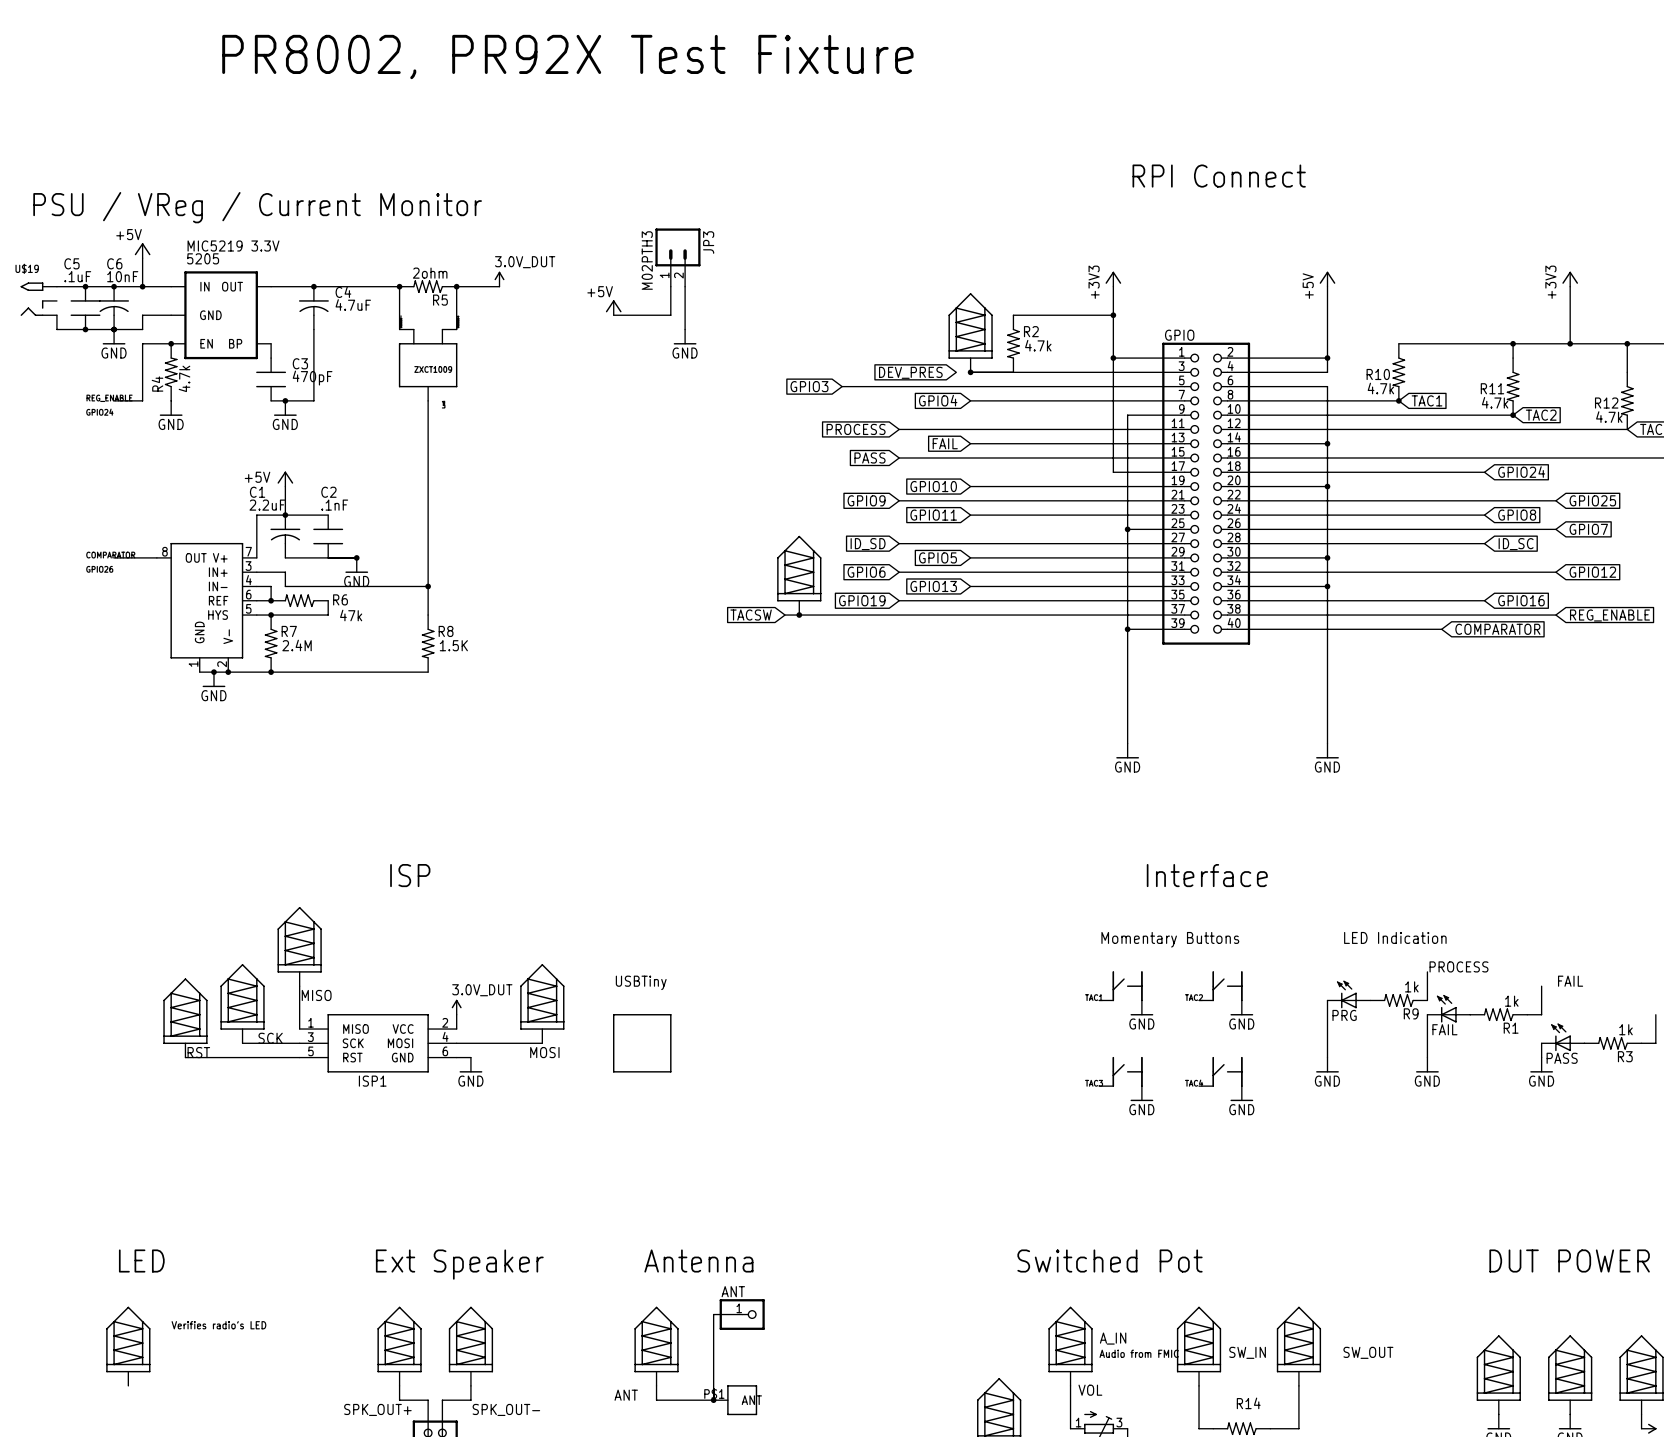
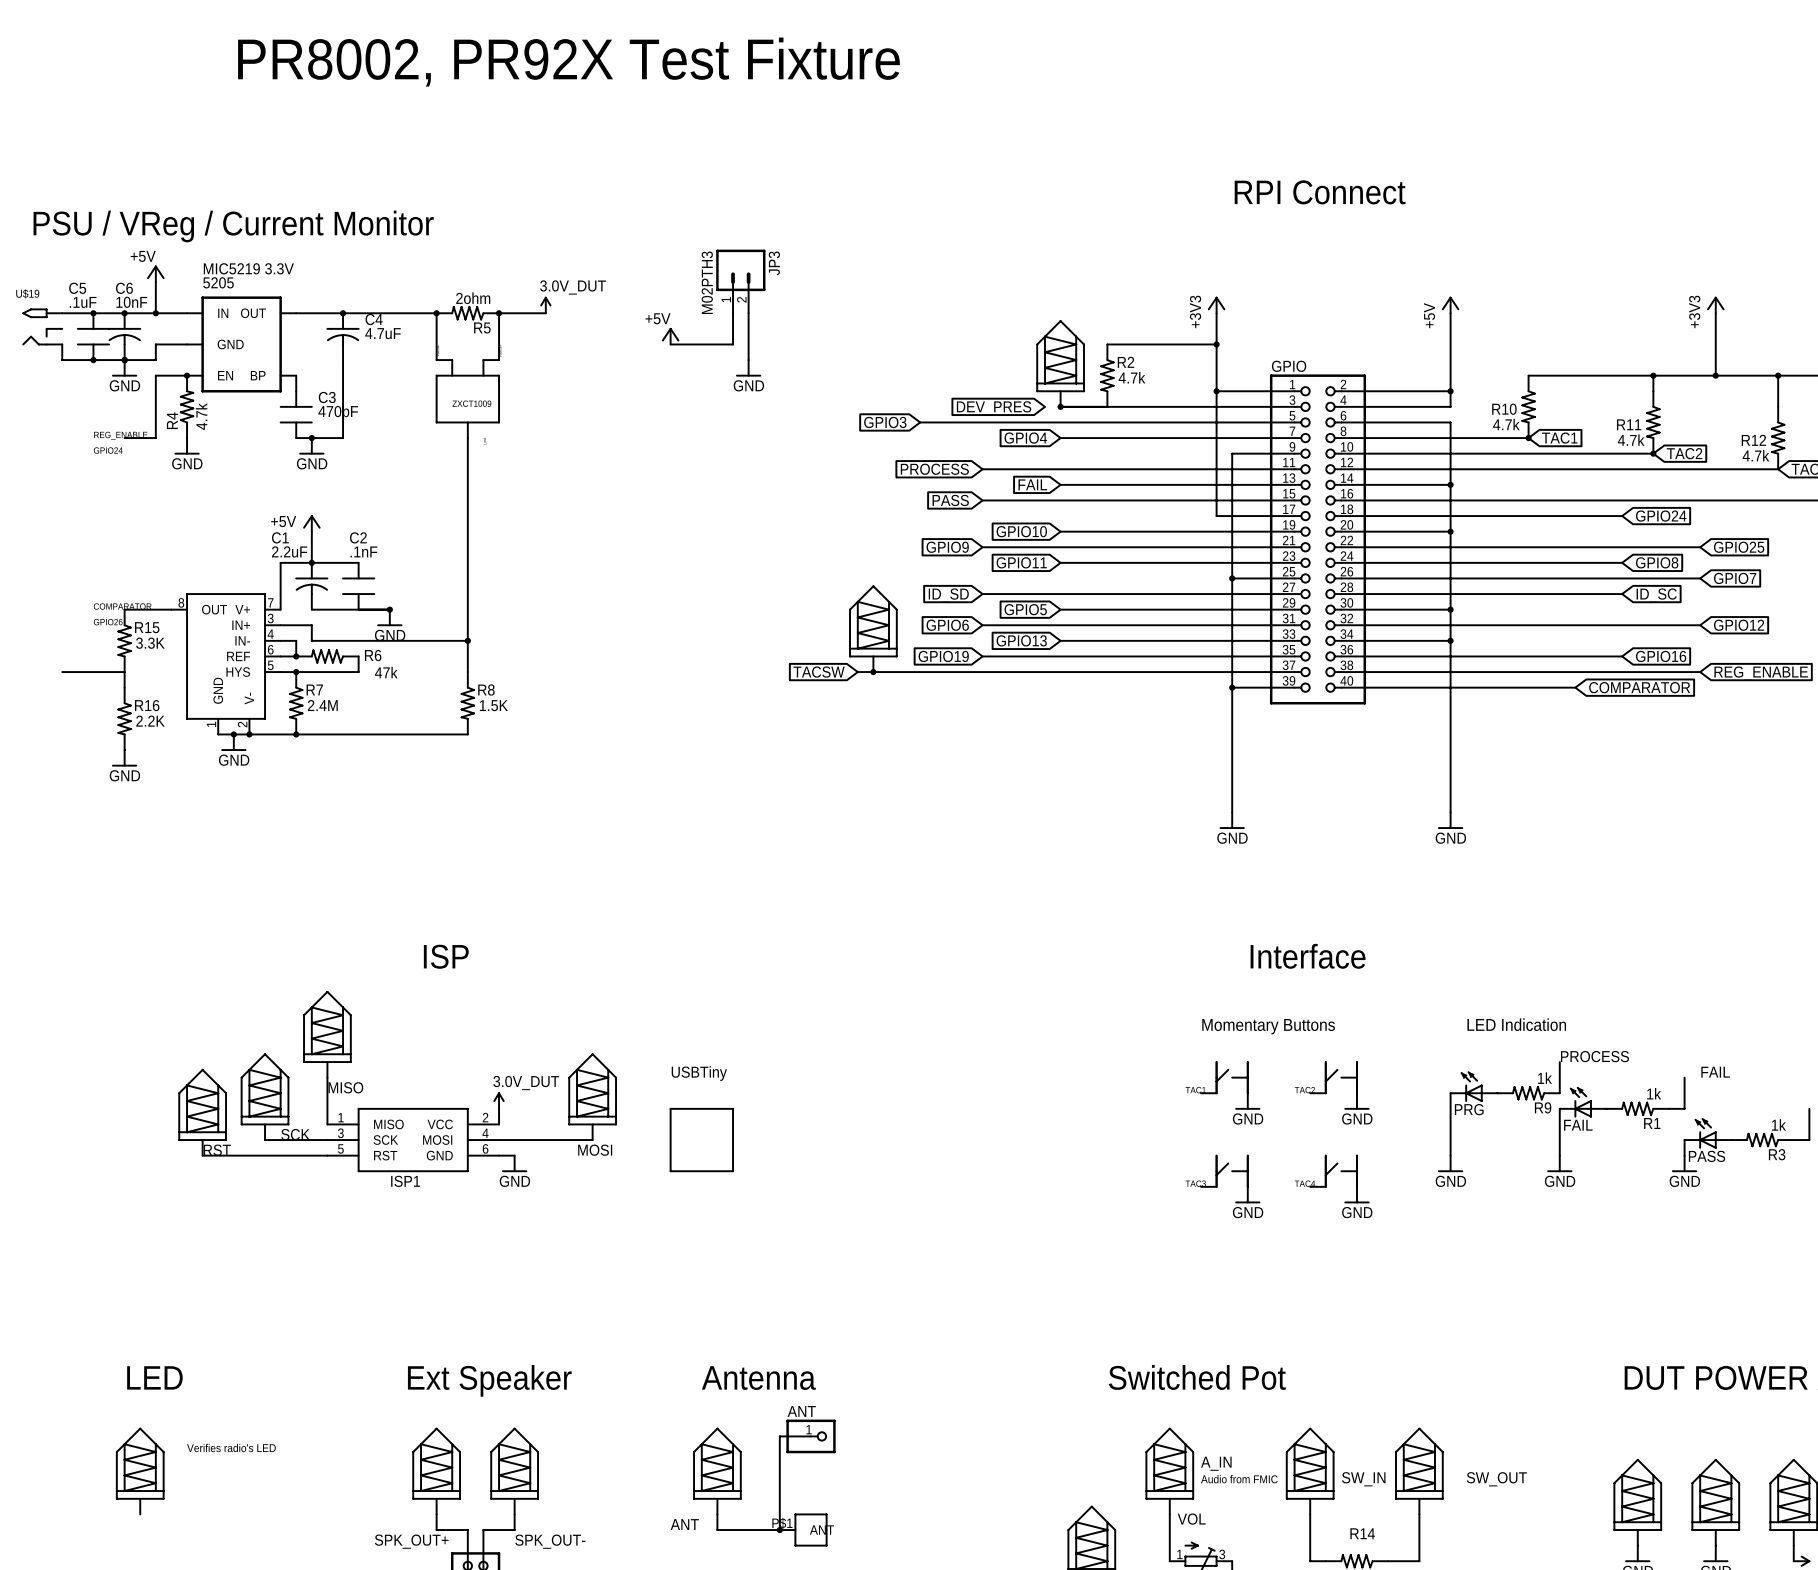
R15: none -> 3.3K (124, 640)
wire: none -> (62, 672) (124, 672) (124, 687)
R16: none -> 2.2K (124, 718)
power symbol: none -> GND (124, 758)

